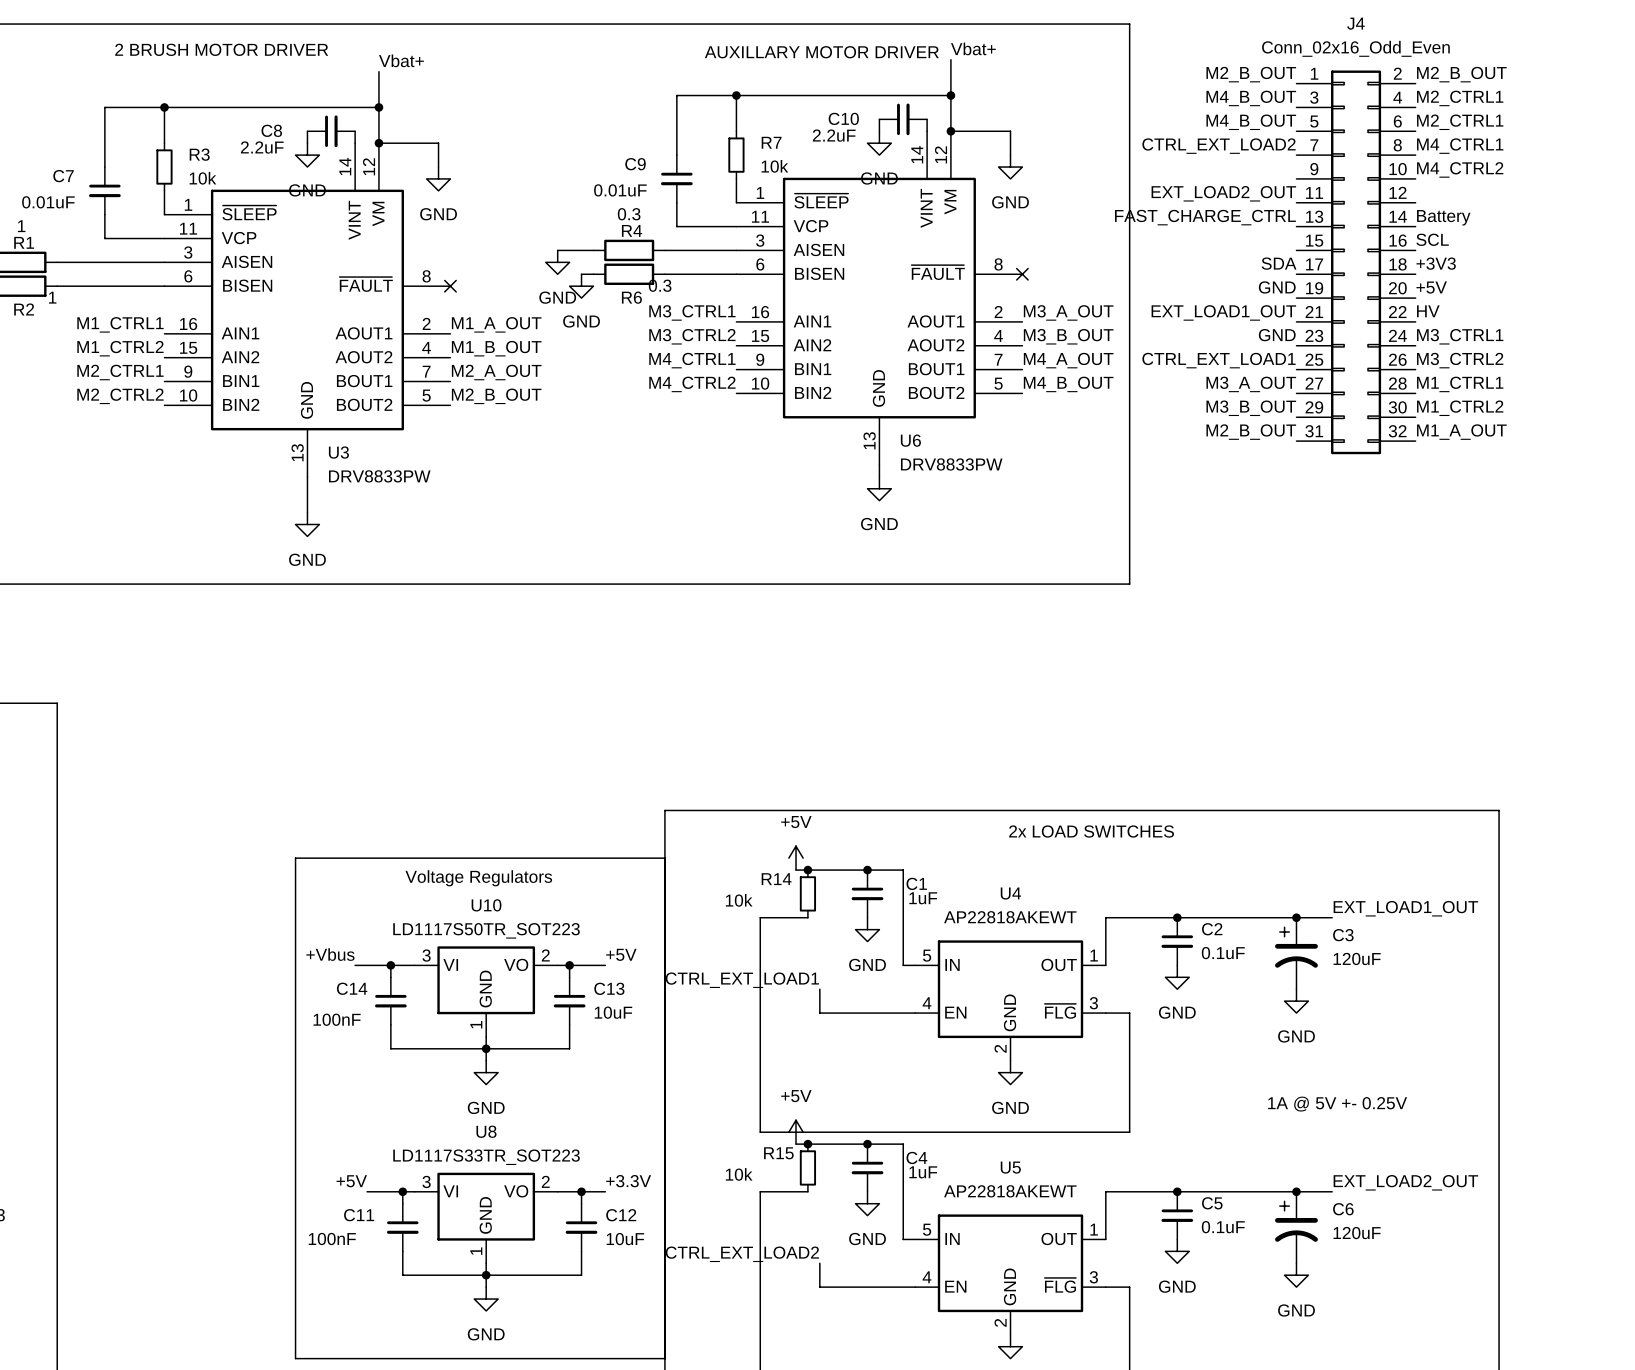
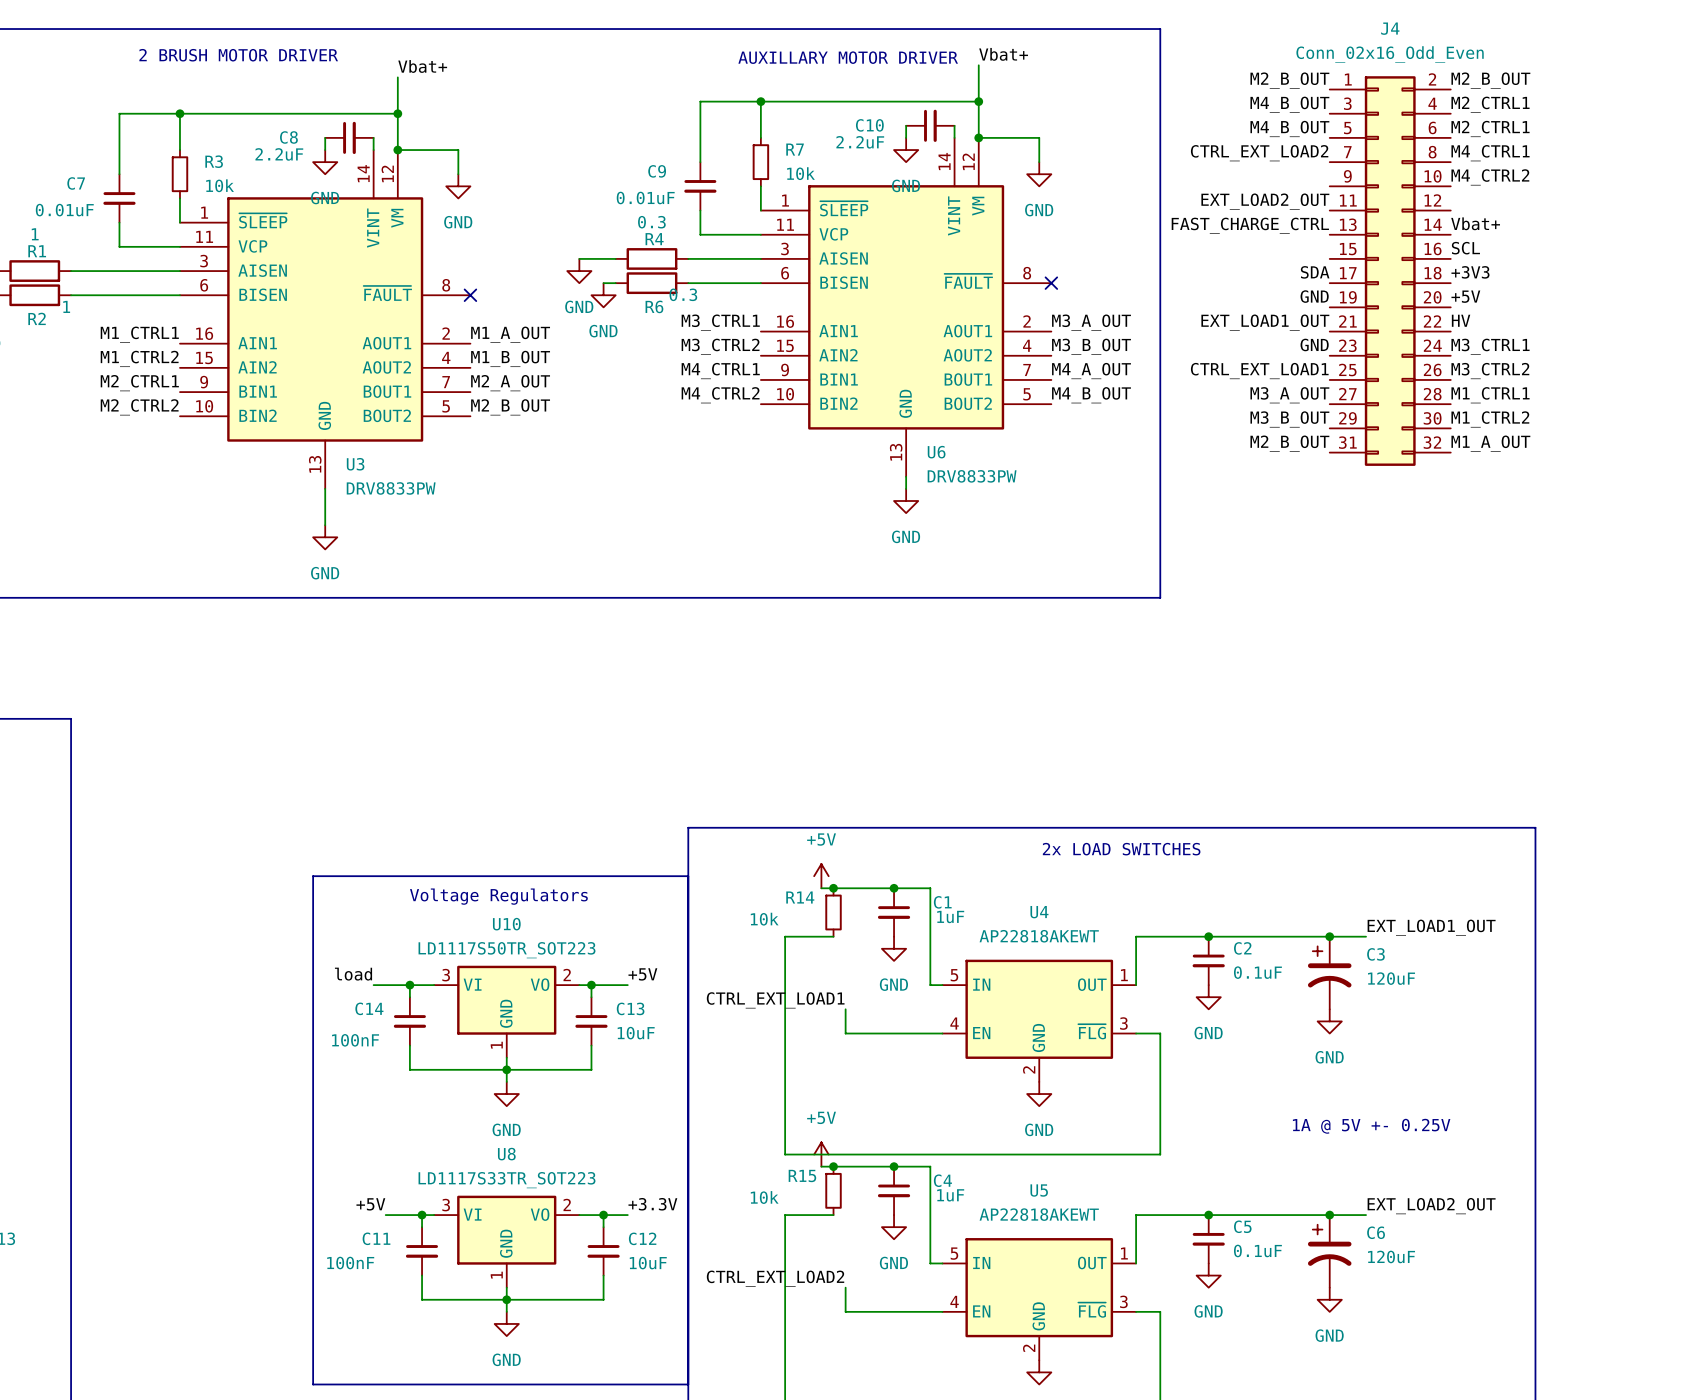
label: Battery (1443, 217) -> Vbat+ (1475, 223)
label: +Vbus (330, 954) -> load (353, 974)

